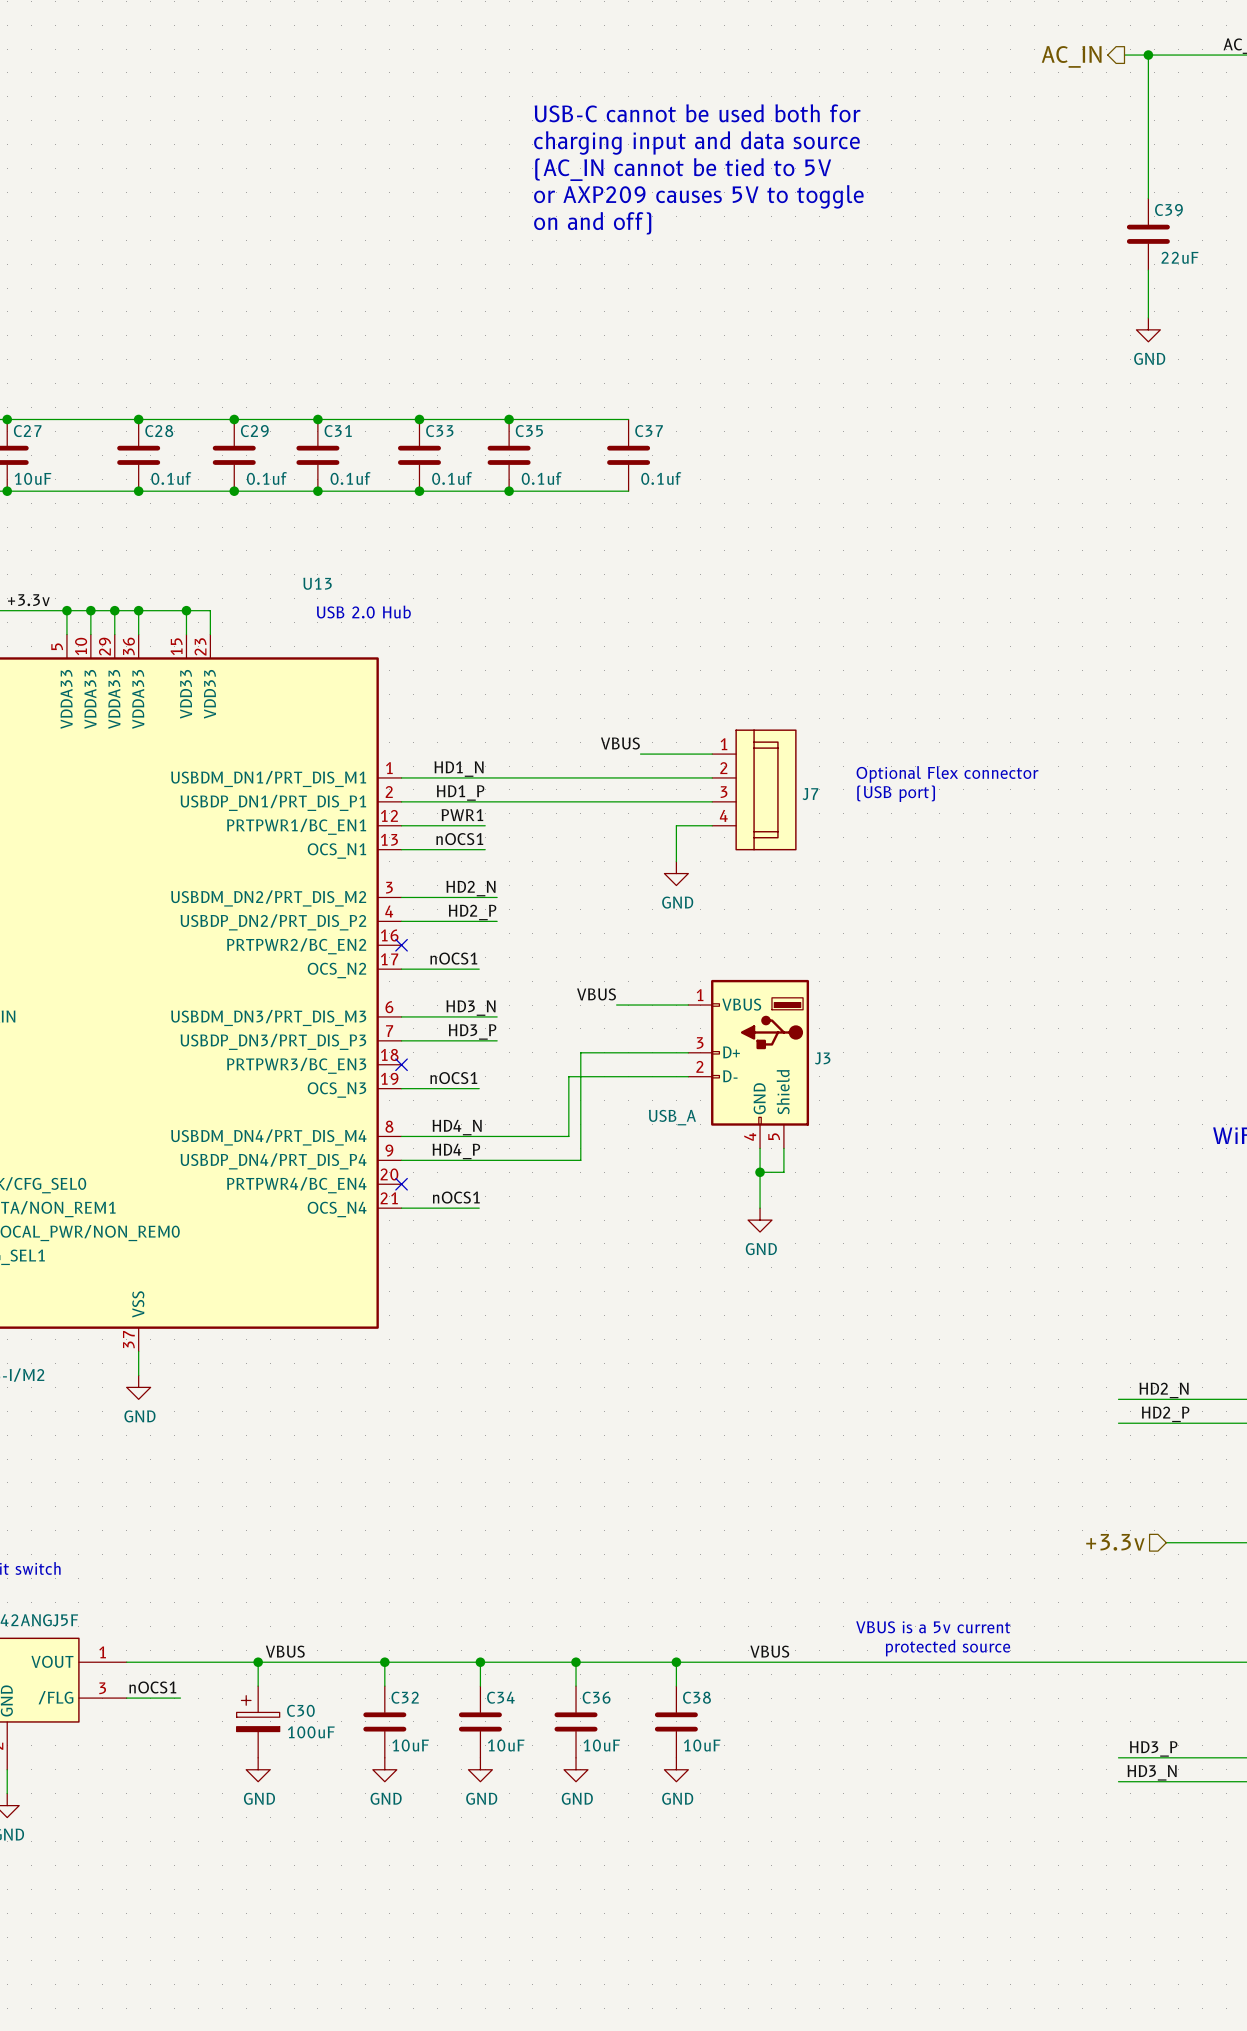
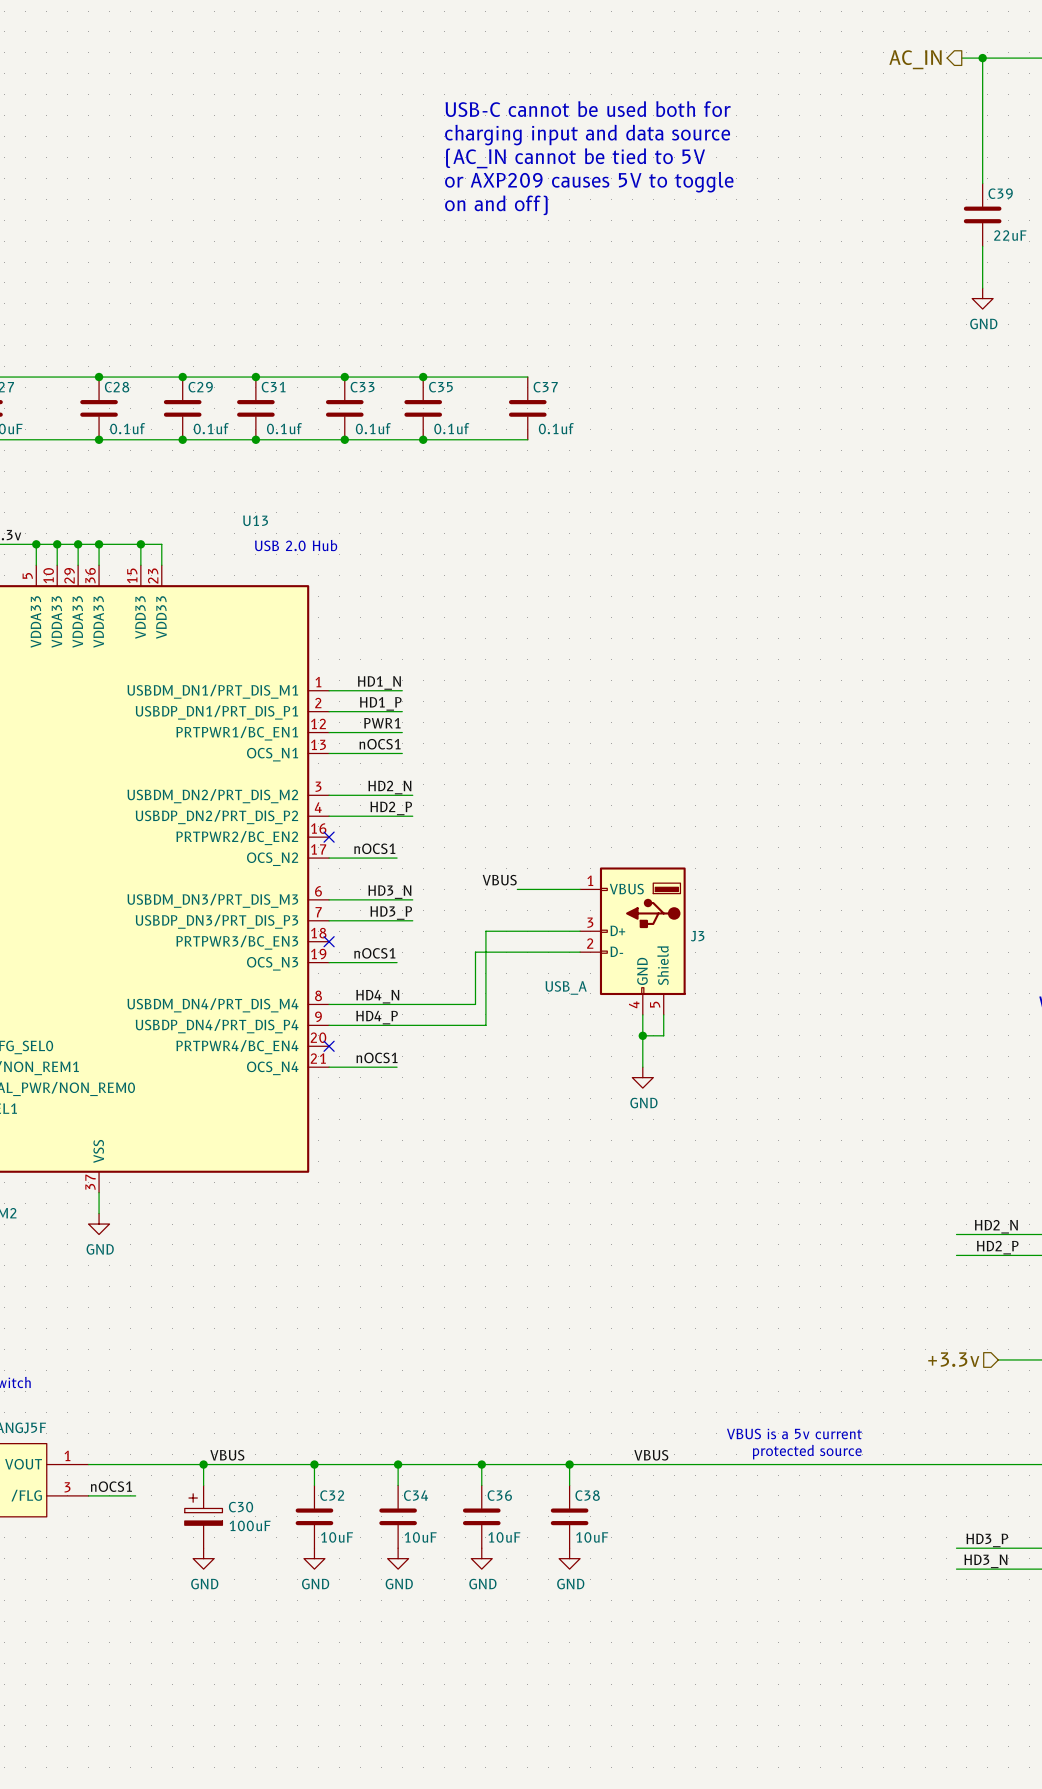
label: VBUS (620, 743) -> none
wire: (640, 754) (712, 754) -> none
text: Optional Flex connector (947, 774) -> none
wire: (485, 777) (712, 777) -> none
J7: (754, 789) -> none
text: (USB port) (896, 793) -> none
wire: (485, 801) (712, 801) -> none
wire: (712, 825) (676, 825) (676, 861) -> none
power symbol: GND (676, 873) -> none

